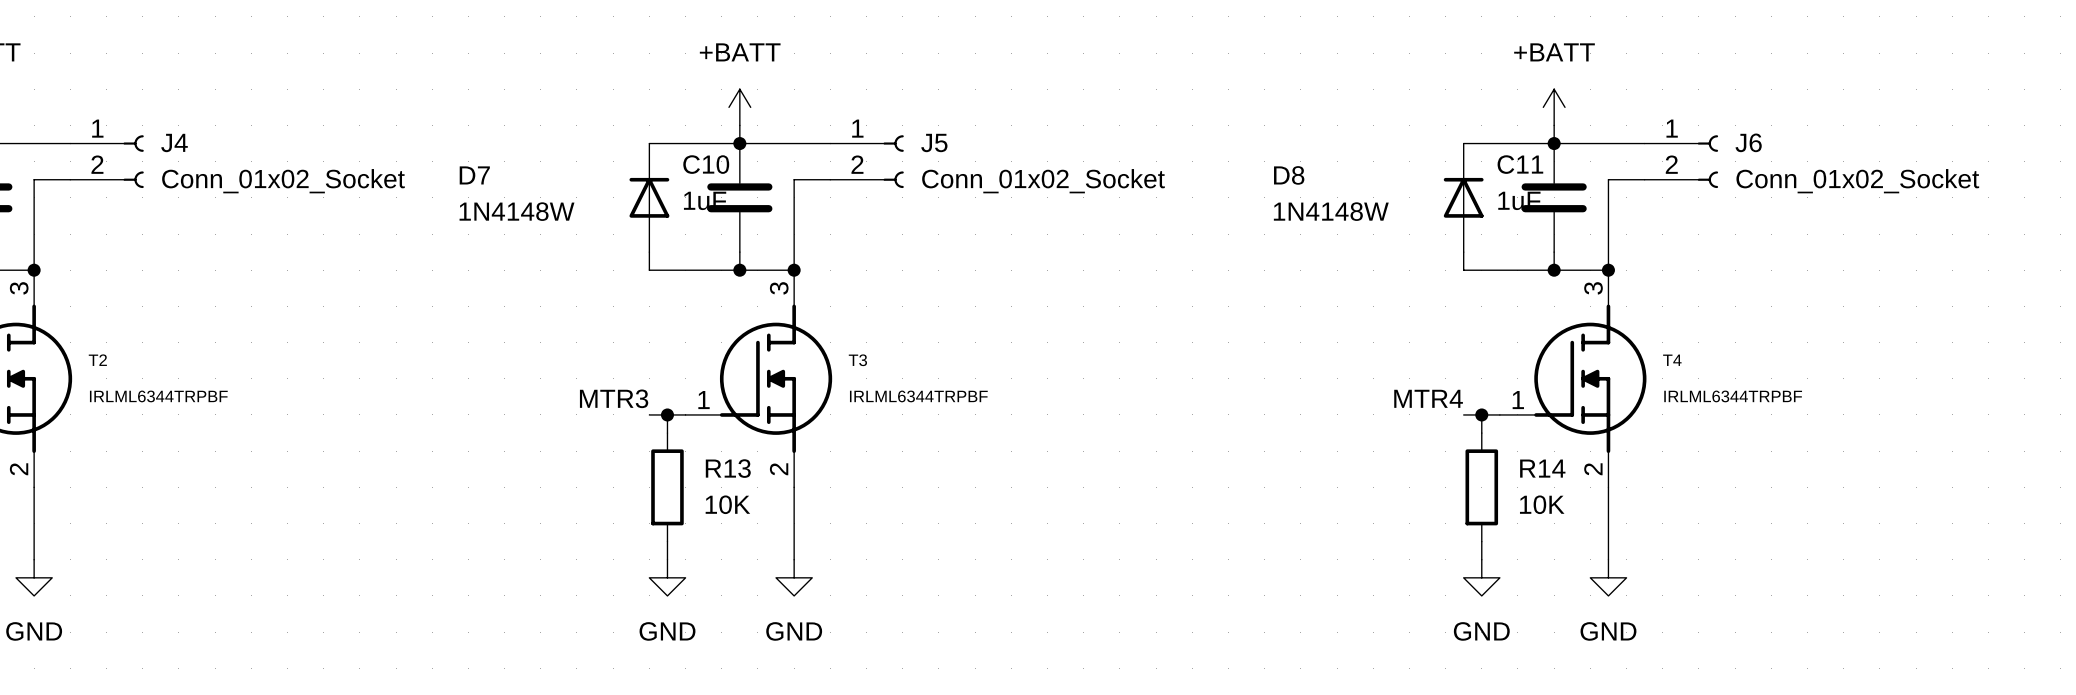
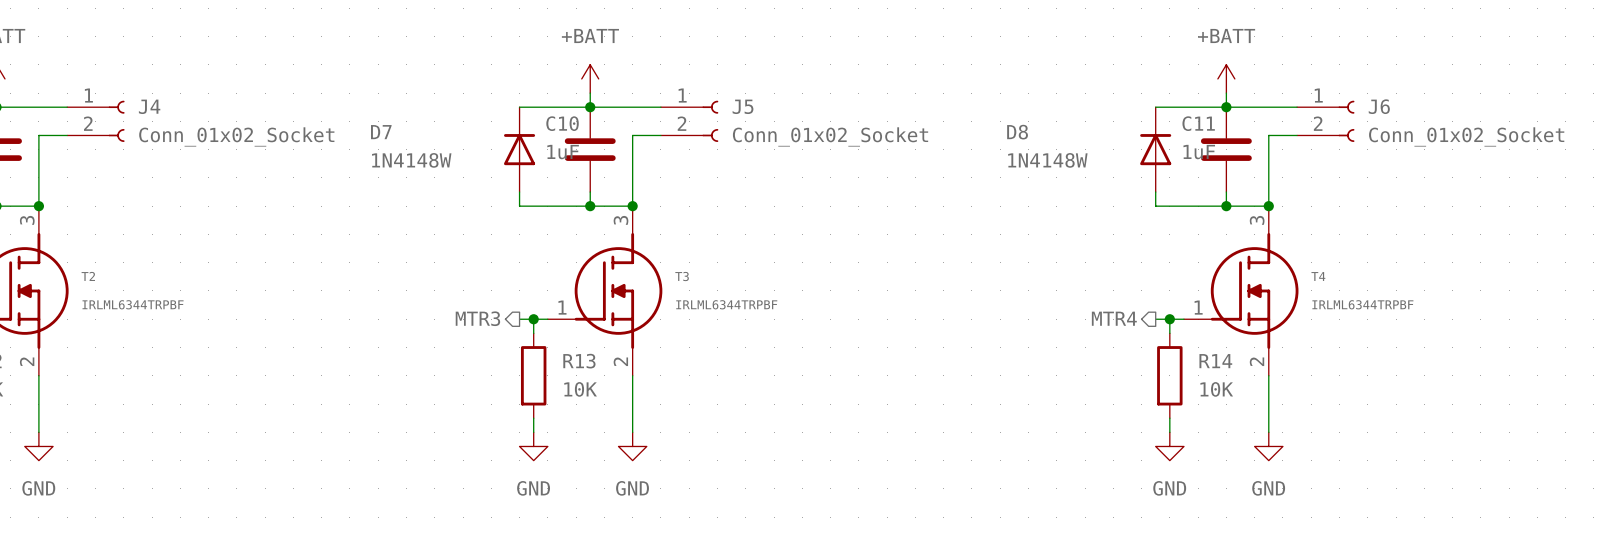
label: MTR3 (614, 398) -> none
label: MTR4 (1428, 398) -> none
hierarchical label: none -> MTR3 (477, 318)
hierarchical label: none -> MTR4 (1114, 318)

